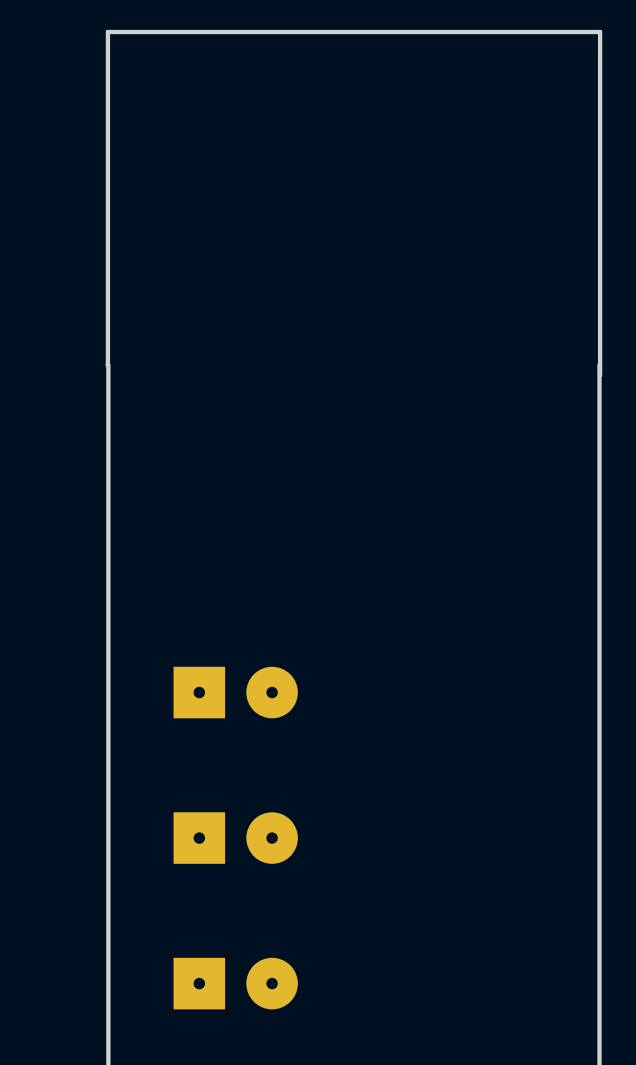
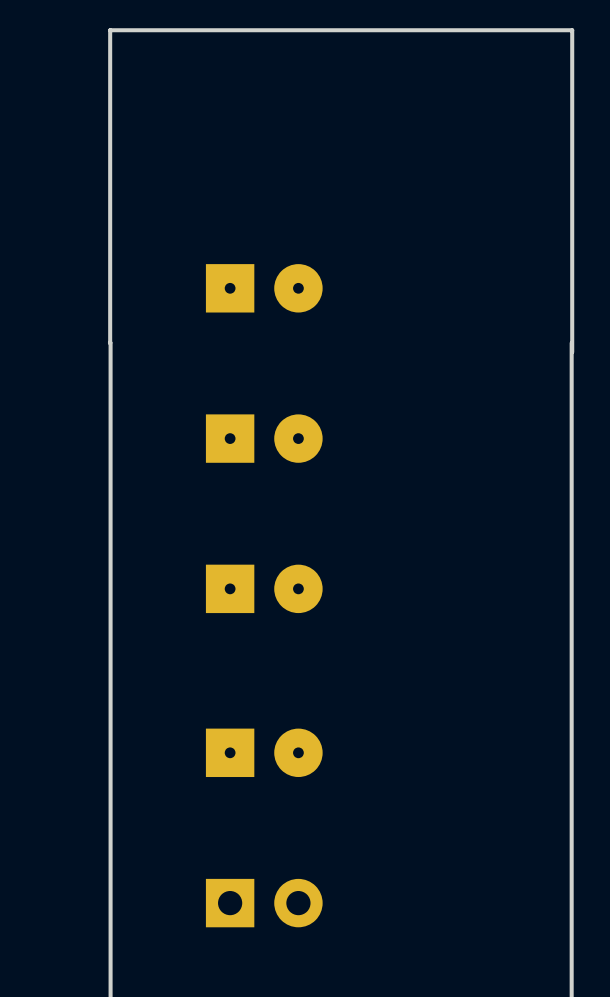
part: none -> (264, 288)
part: none -> (264, 438)
part: none -> (264, 588)
part: (235, 692) -> none
part position: (235, 838) -> (264, 752)
part: none -> (264, 903)
part: (235, 983) -> none

